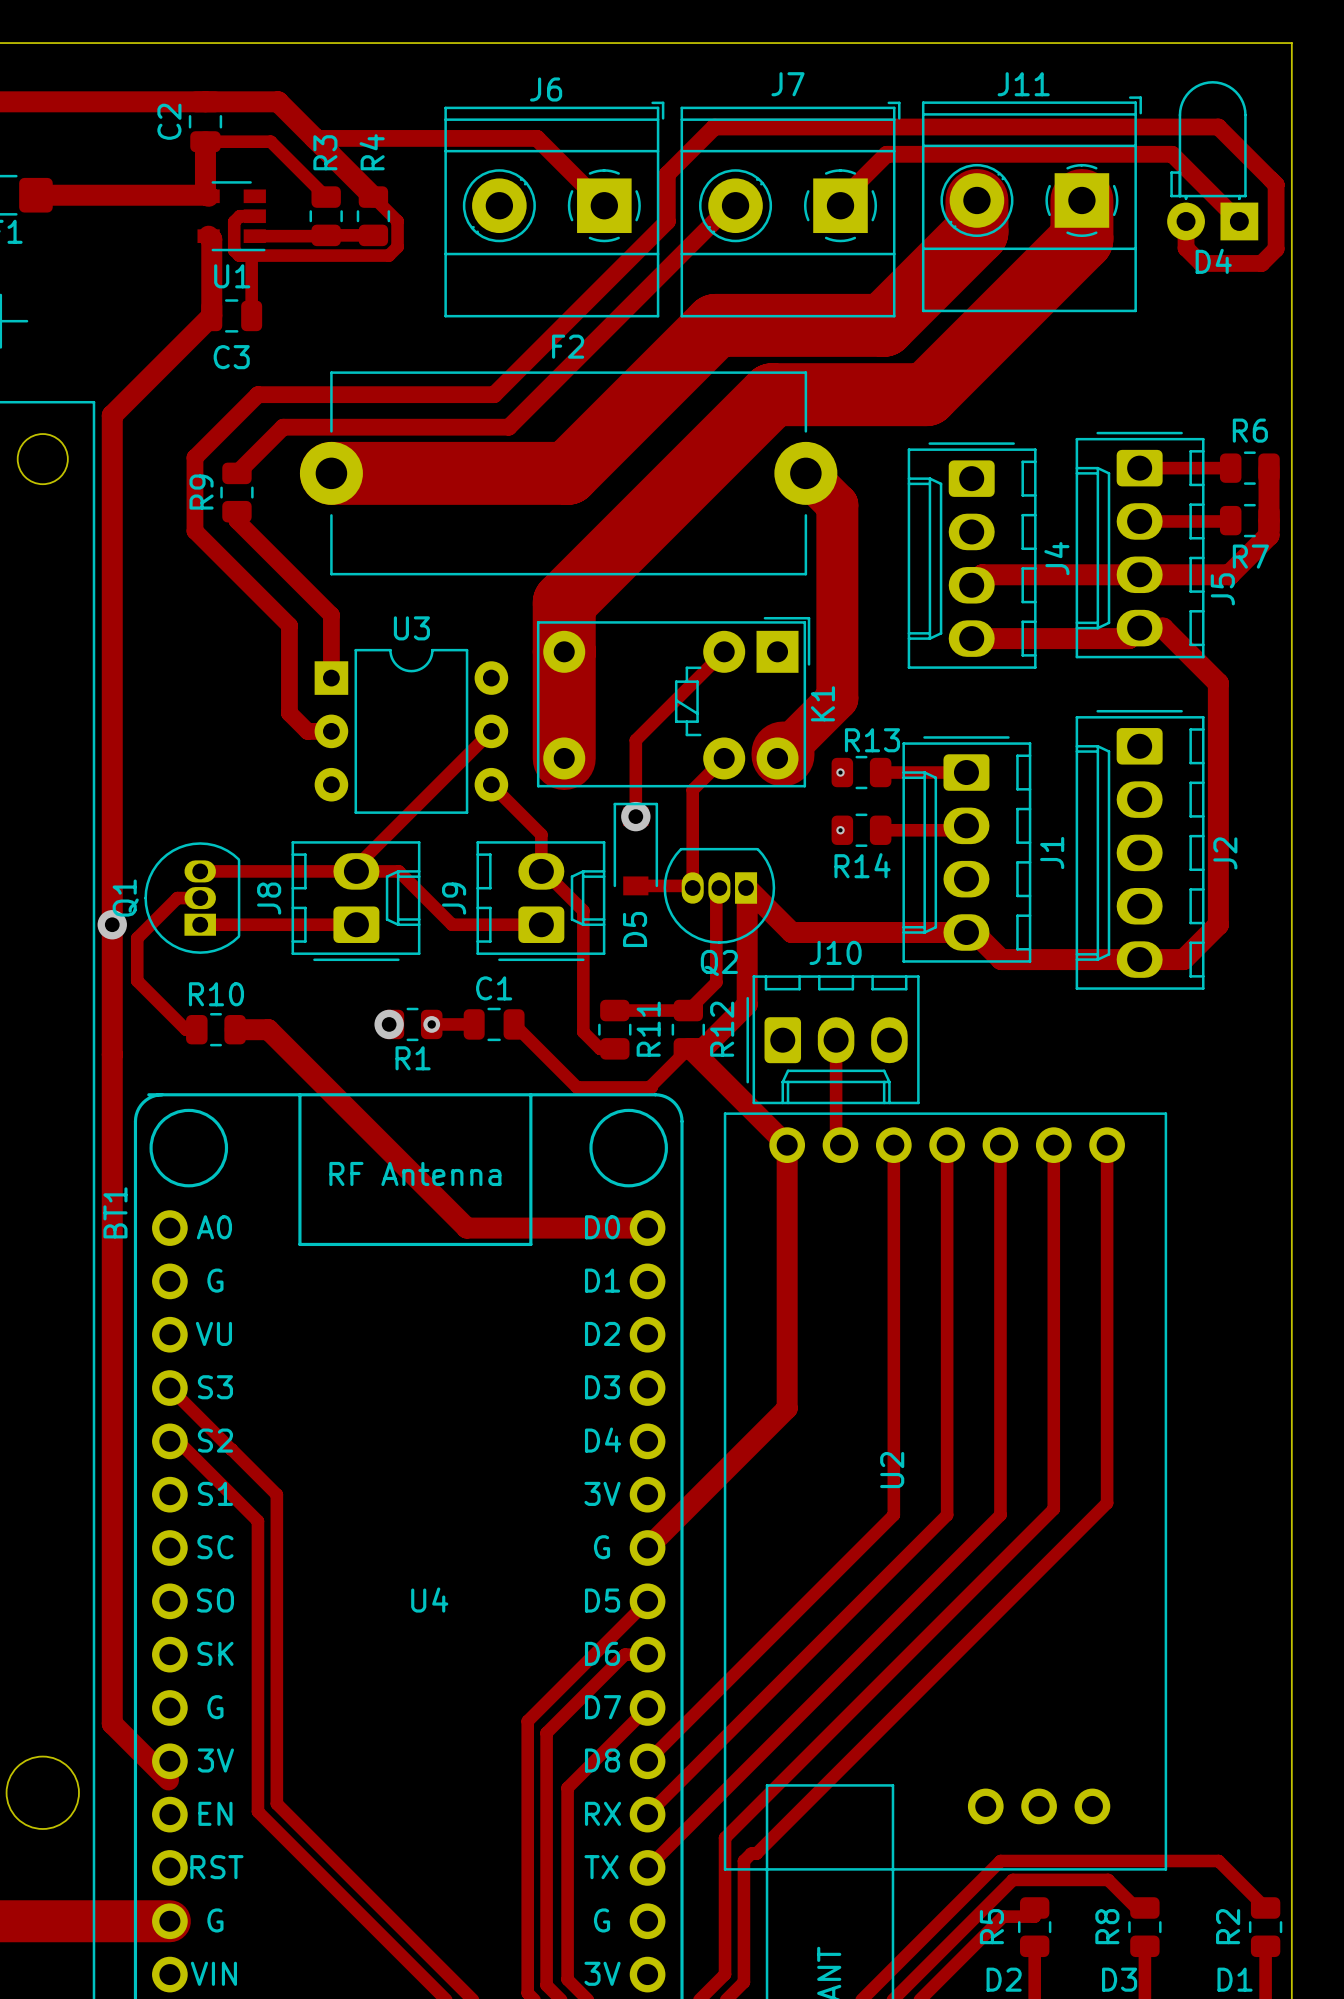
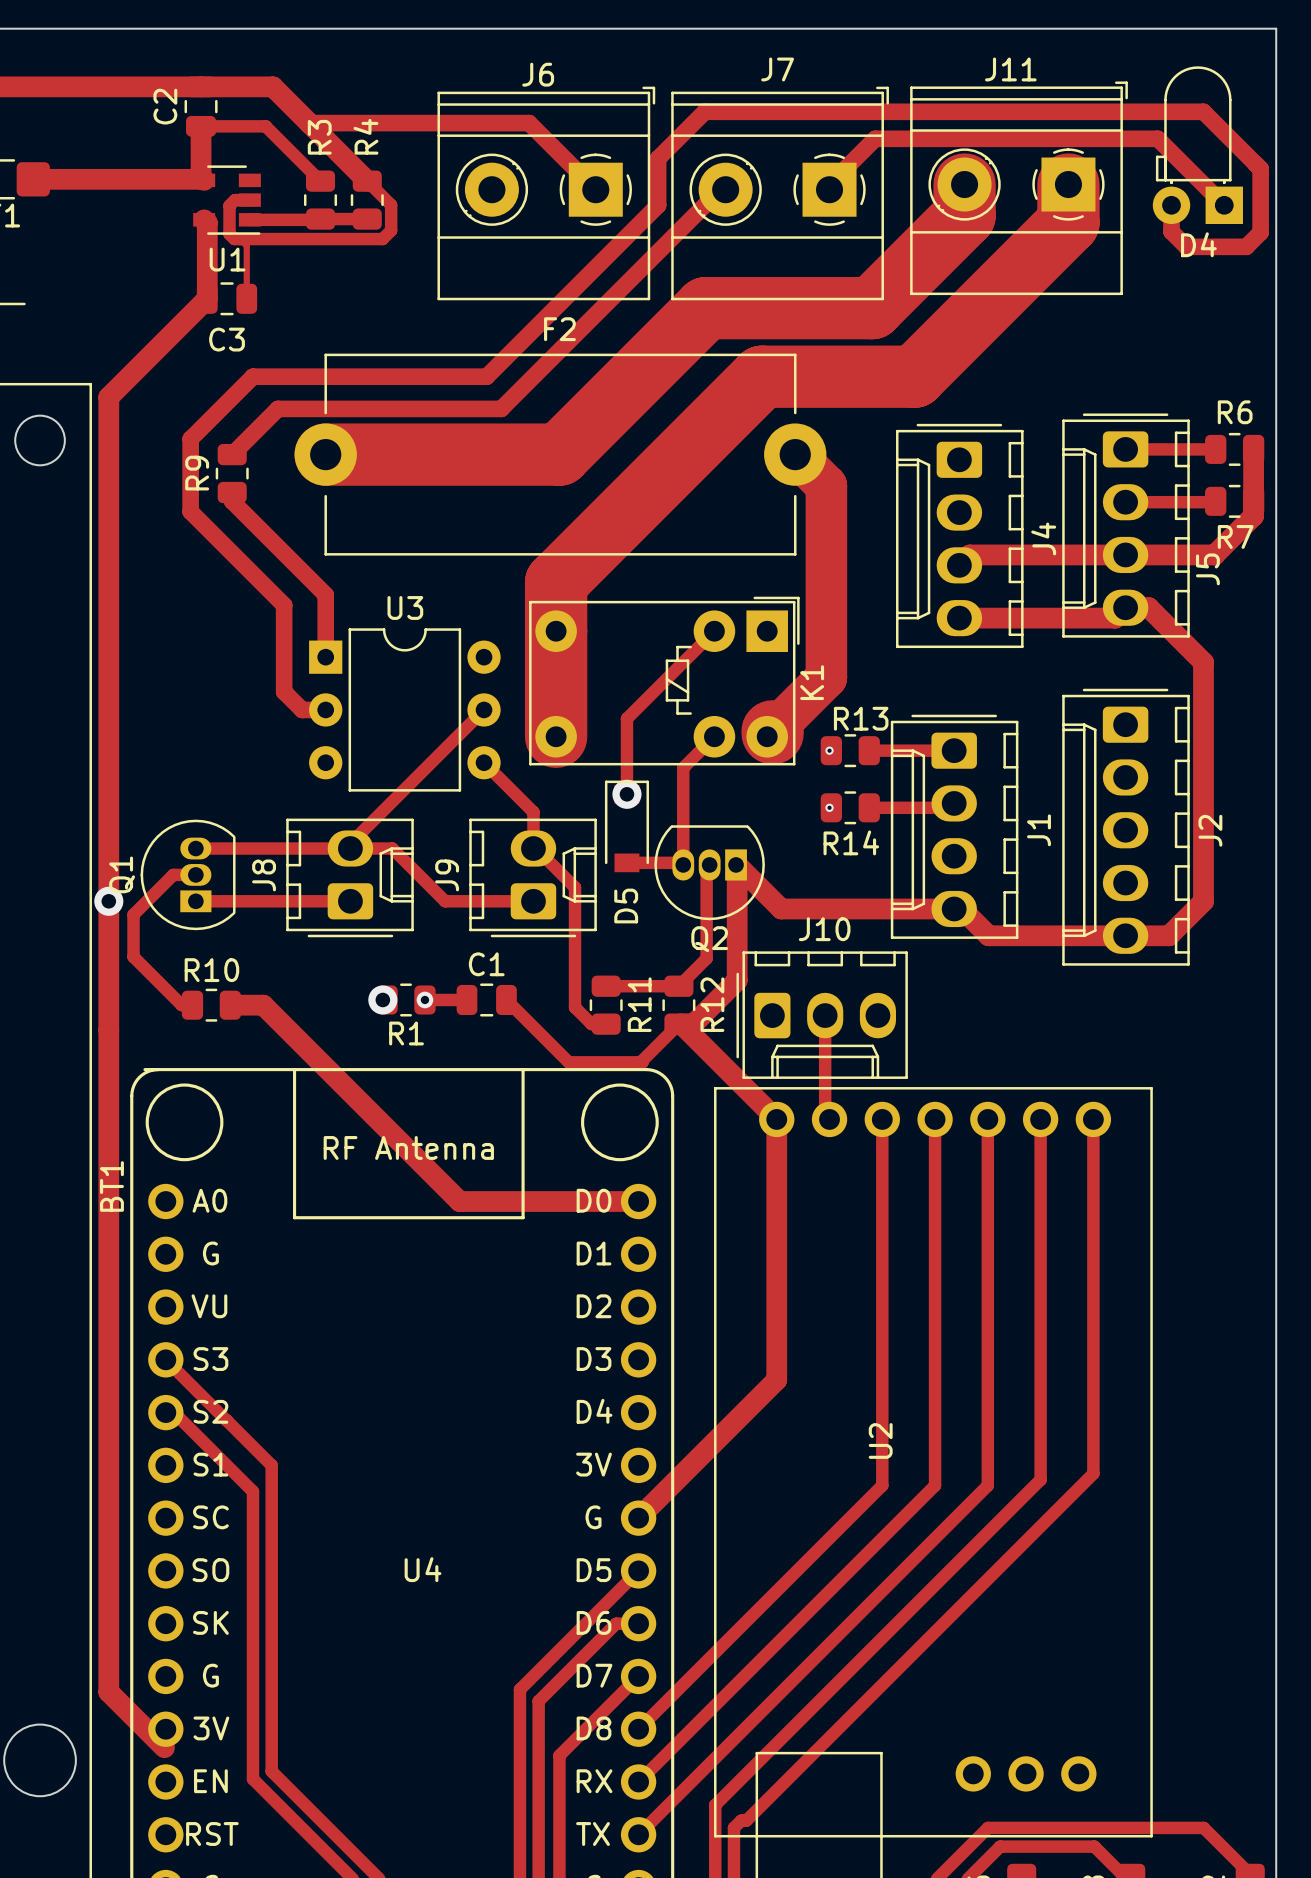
track width: thick (251, 262) (251, 315) -> thin (246, 245) (246, 298)

